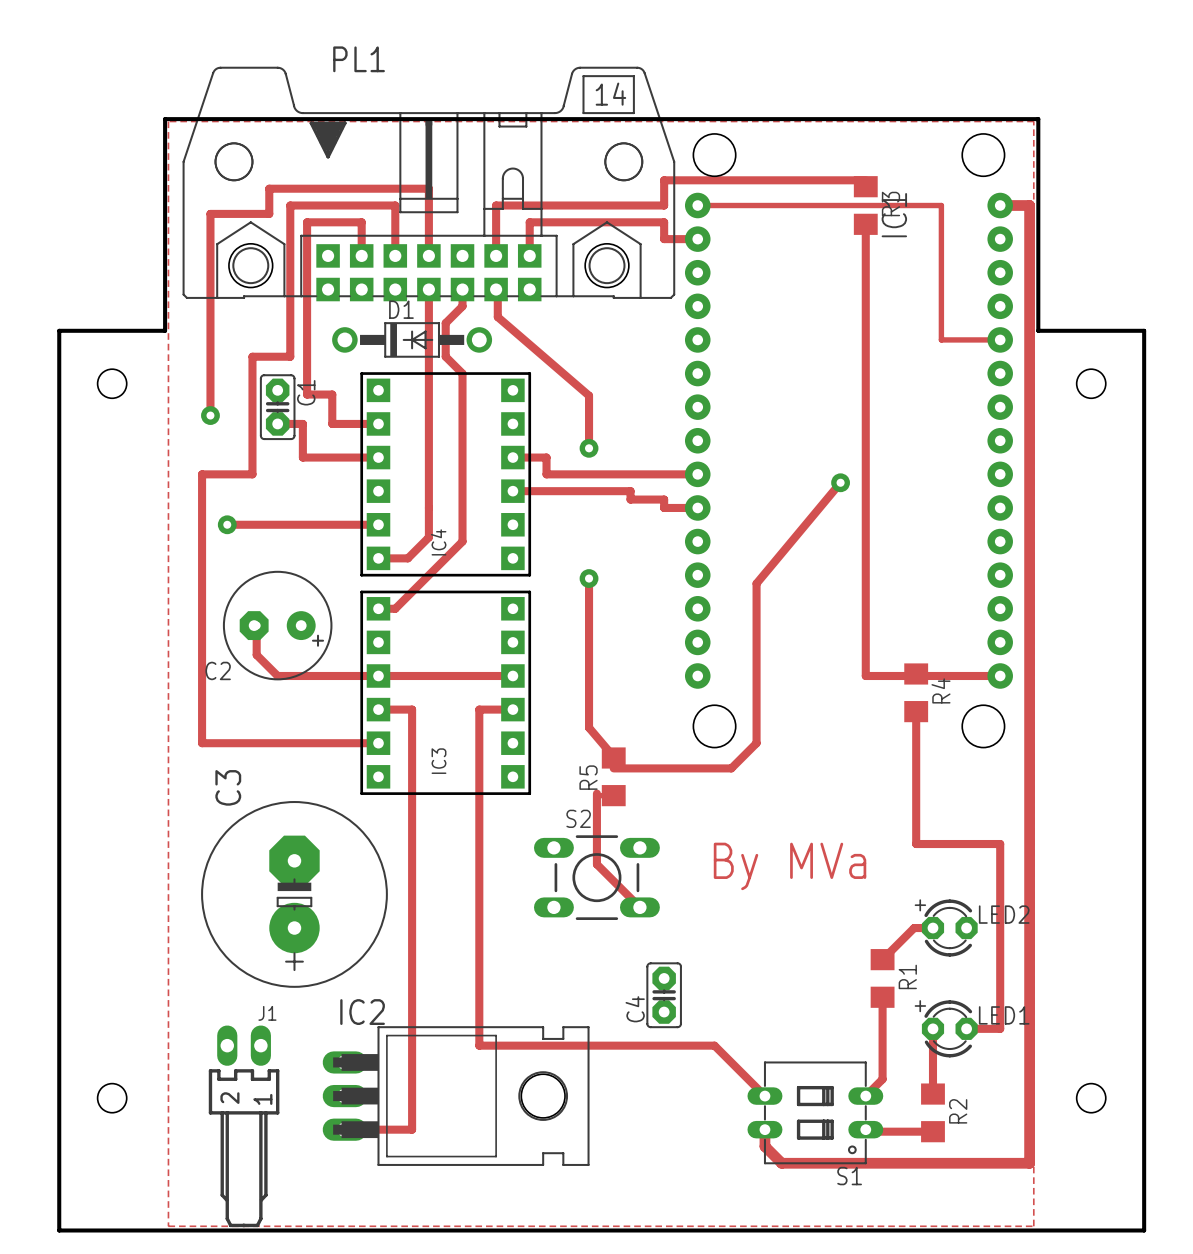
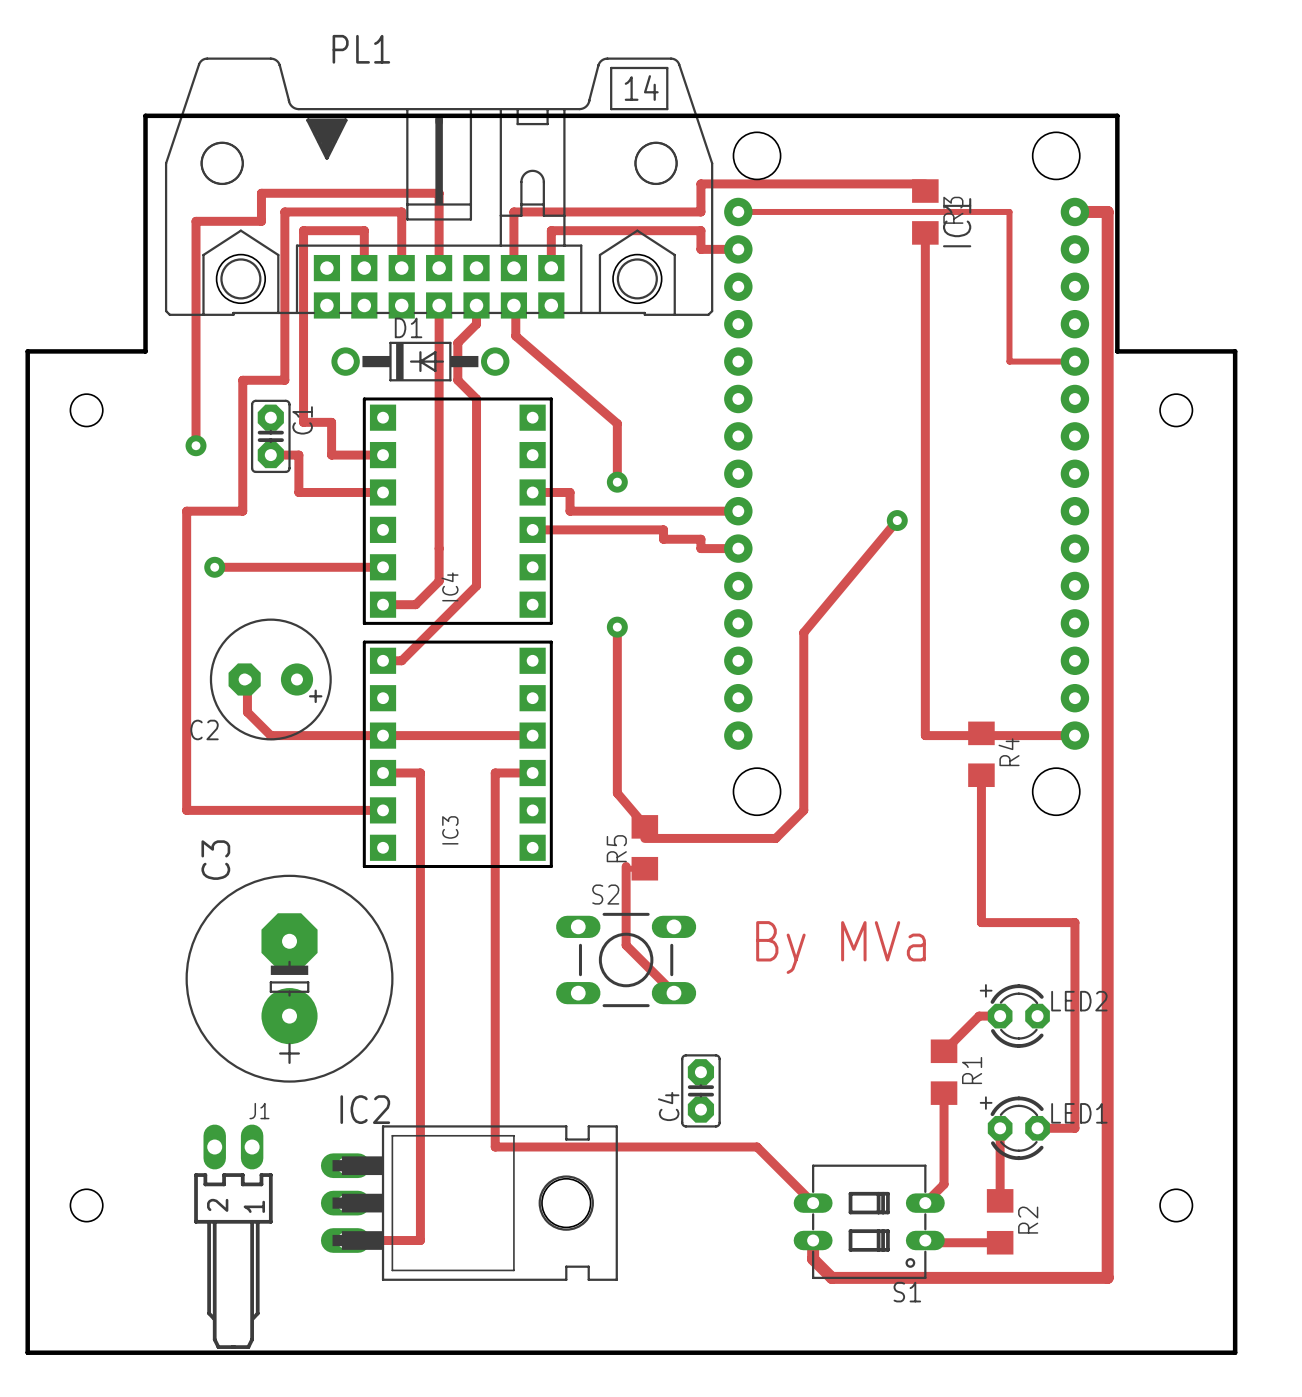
zone outline: (168, 121) (168, 1226) (1033, 1226) (1033, 121) (168, 121) -> none

